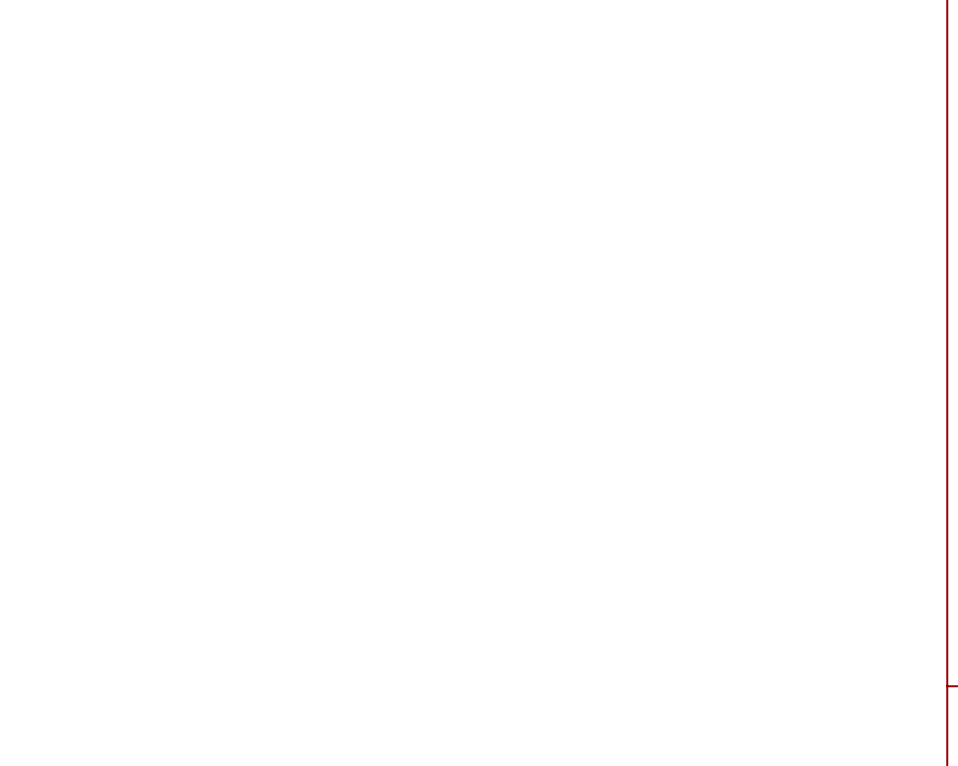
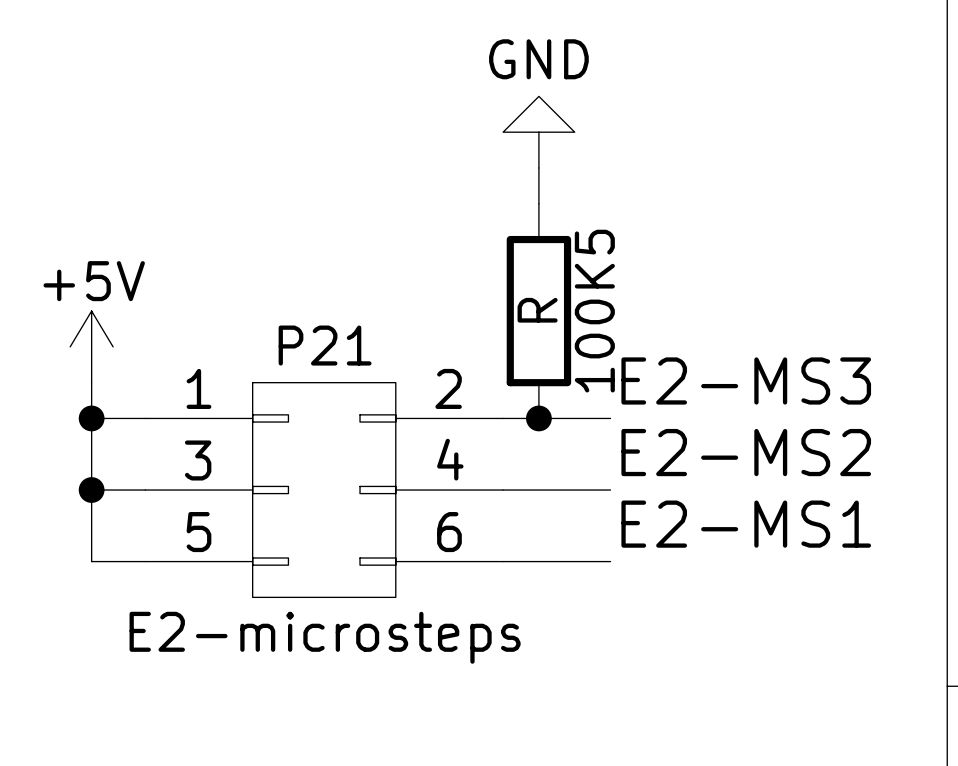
power symbol: none -> GND (538, 132)
wire: none -> (538, 167) (538, 203)
100K5: none -> R (538, 311)
power symbol: none -> +5V (91, 346)
label: none -> E2-MS3 (746, 380)
wire: none -> (91, 382) (91, 561) (145, 561)
wire: none -> (91, 418) (145, 418)
junction: none -> (91, 418)
wire: none -> (503, 418) (610, 418)
junction: none -> (538, 418)
label: none -> E2-MS2 (746, 452)
wire: none -> (91, 490) (145, 490)
junction: none -> (91, 490)
P21: none -> E2-microsteps (324, 490)
wire: none -> (503, 490) (610, 490)
label: none -> E2-MS1 (746, 524)
wire: none -> (503, 561) (610, 561)

